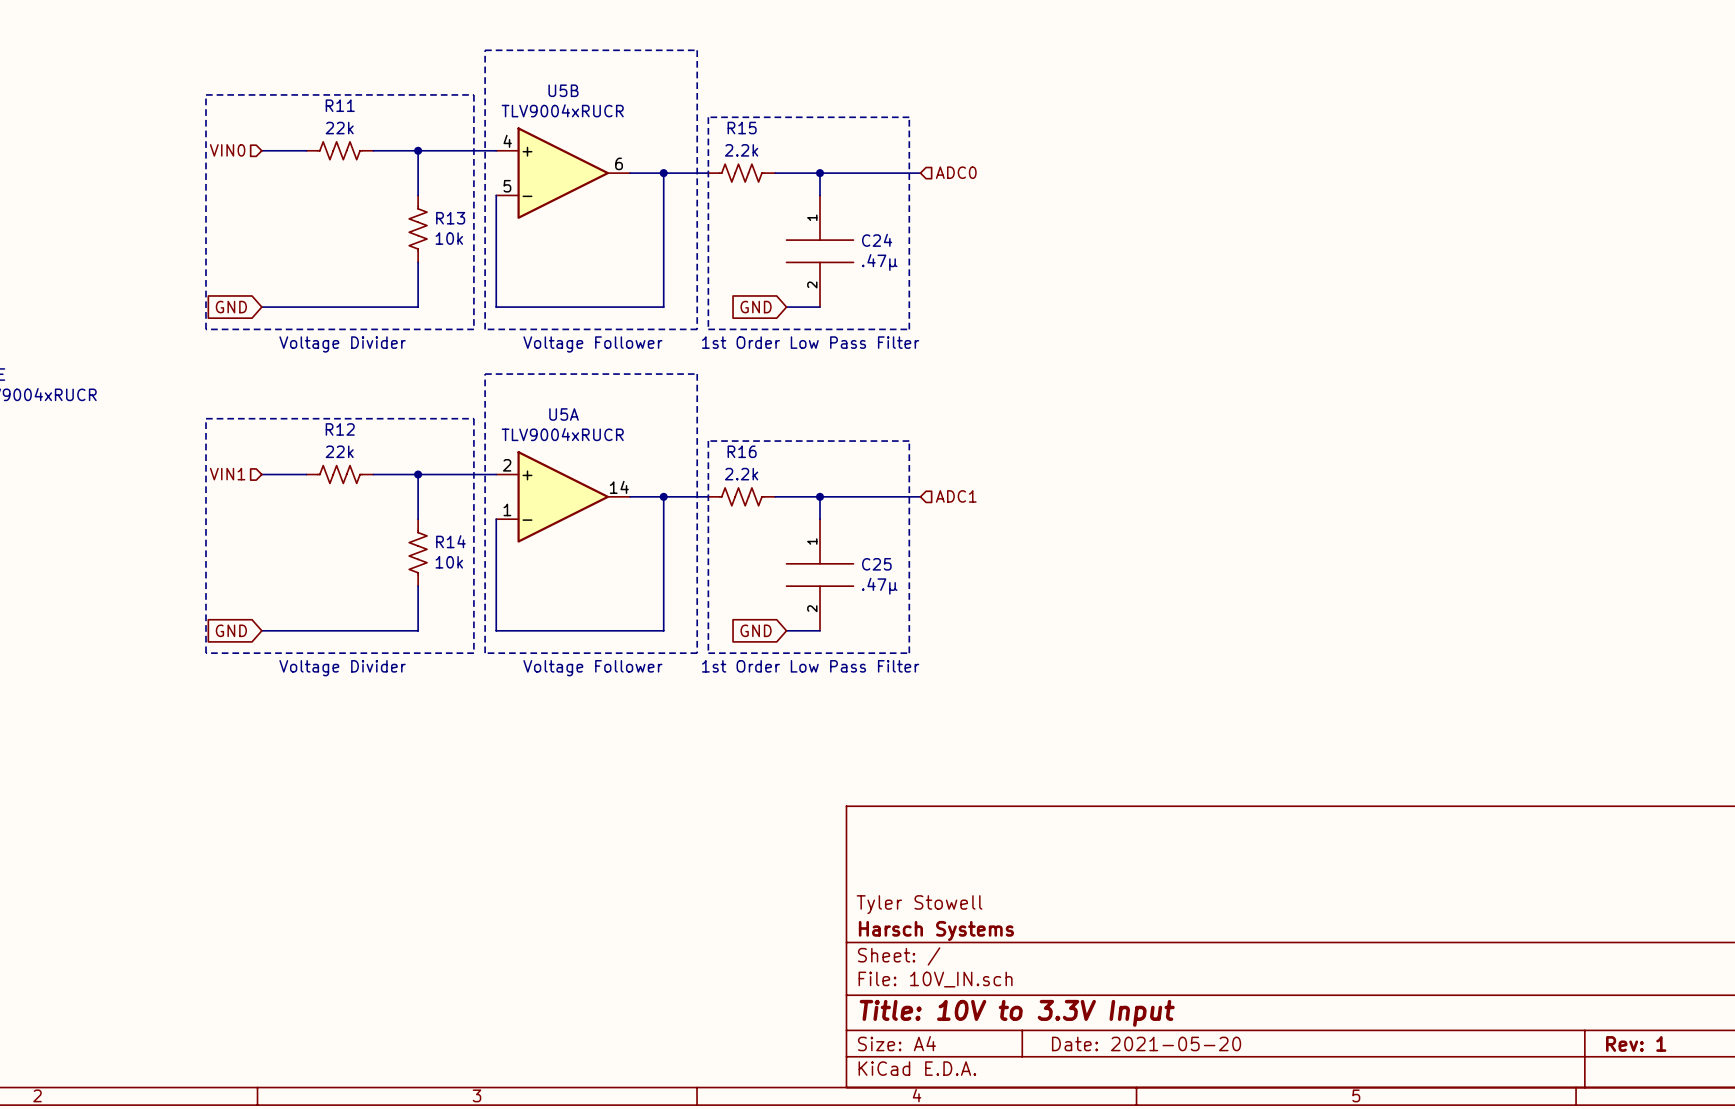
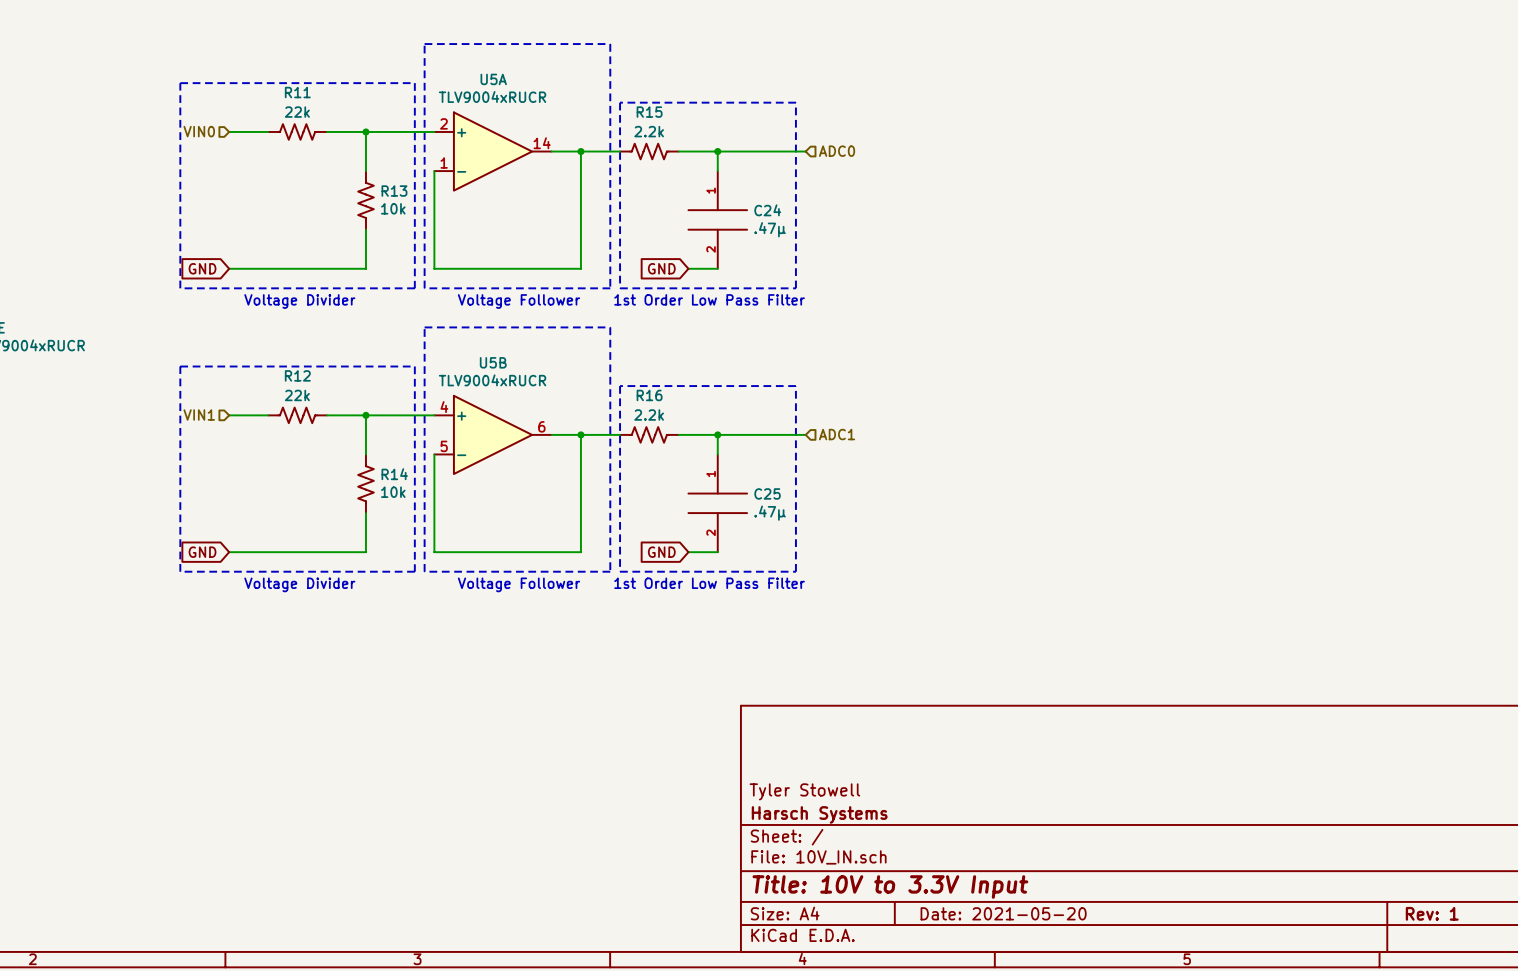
U5B position: (563, 173) -> (493, 434)
U5A position: (563, 496) -> (493, 151)

